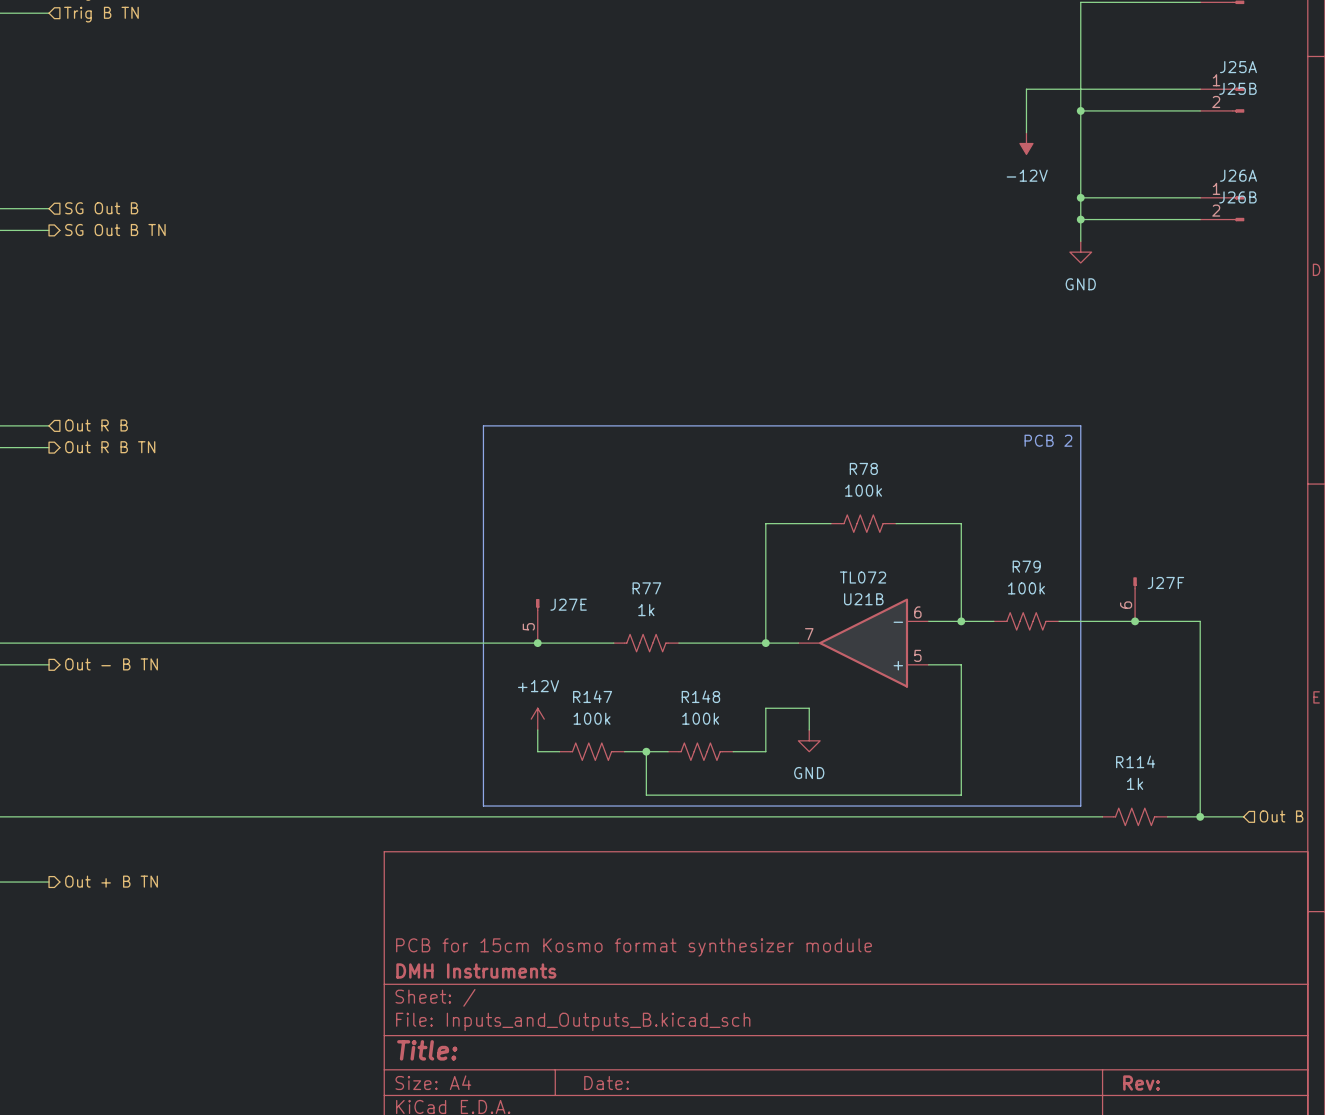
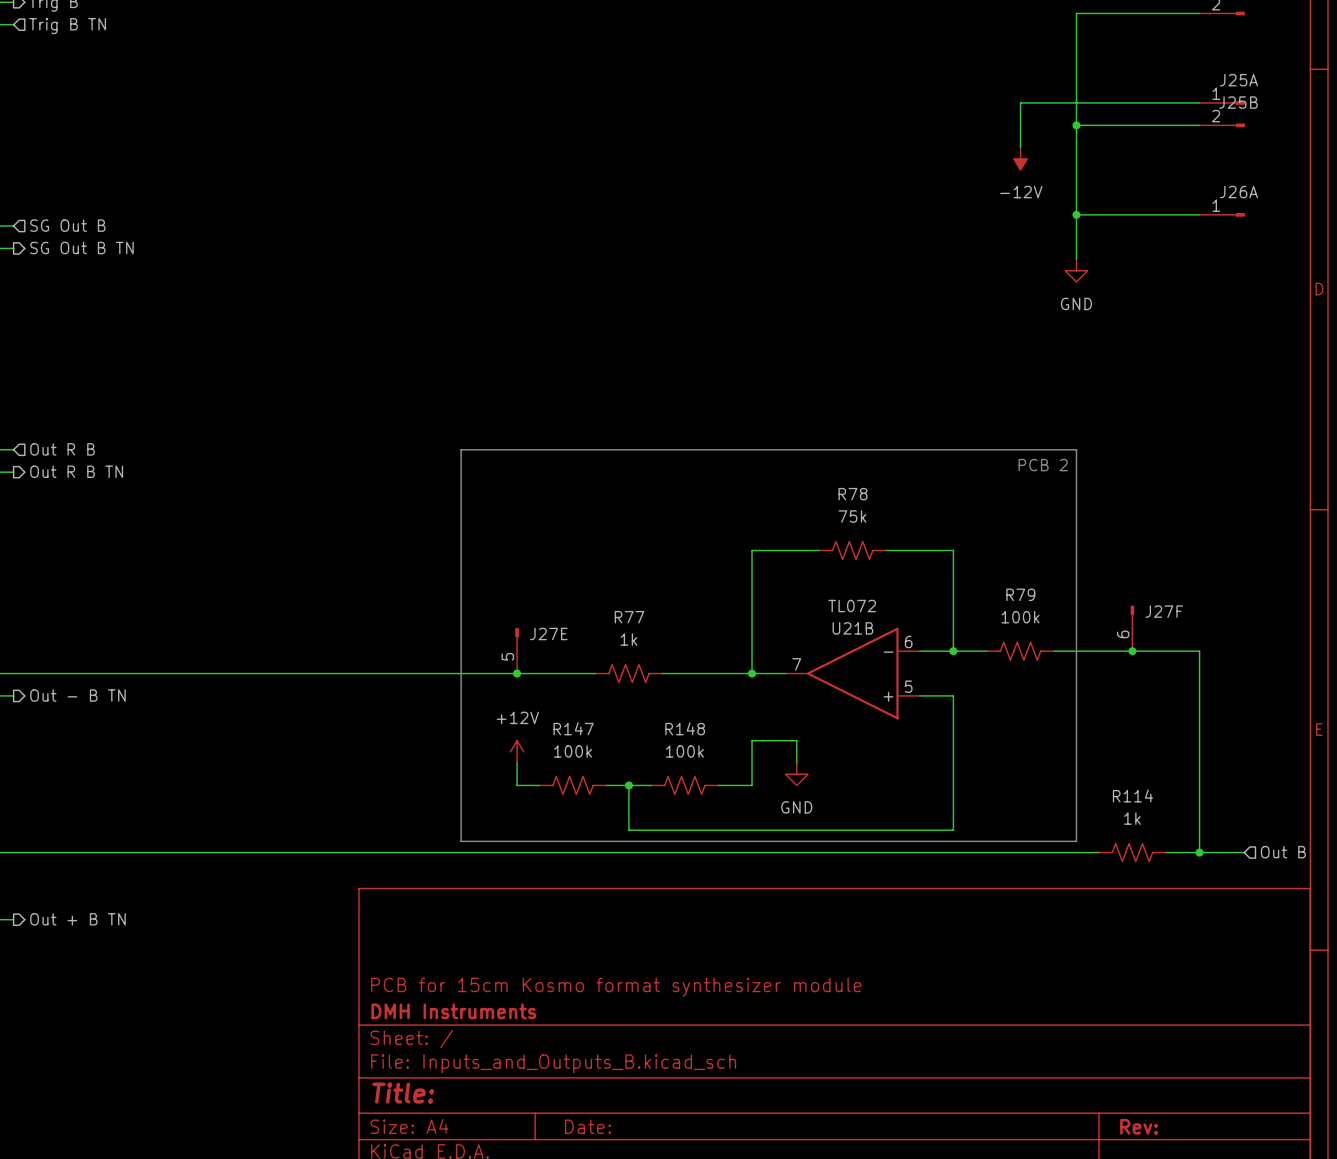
wire: (1080, 219) (1200, 219) -> none
junction: (1080, 219) -> none
J26B: (1222, 219) -> none
R78 value: 100k (863, 490) -> 75k (852, 516)

